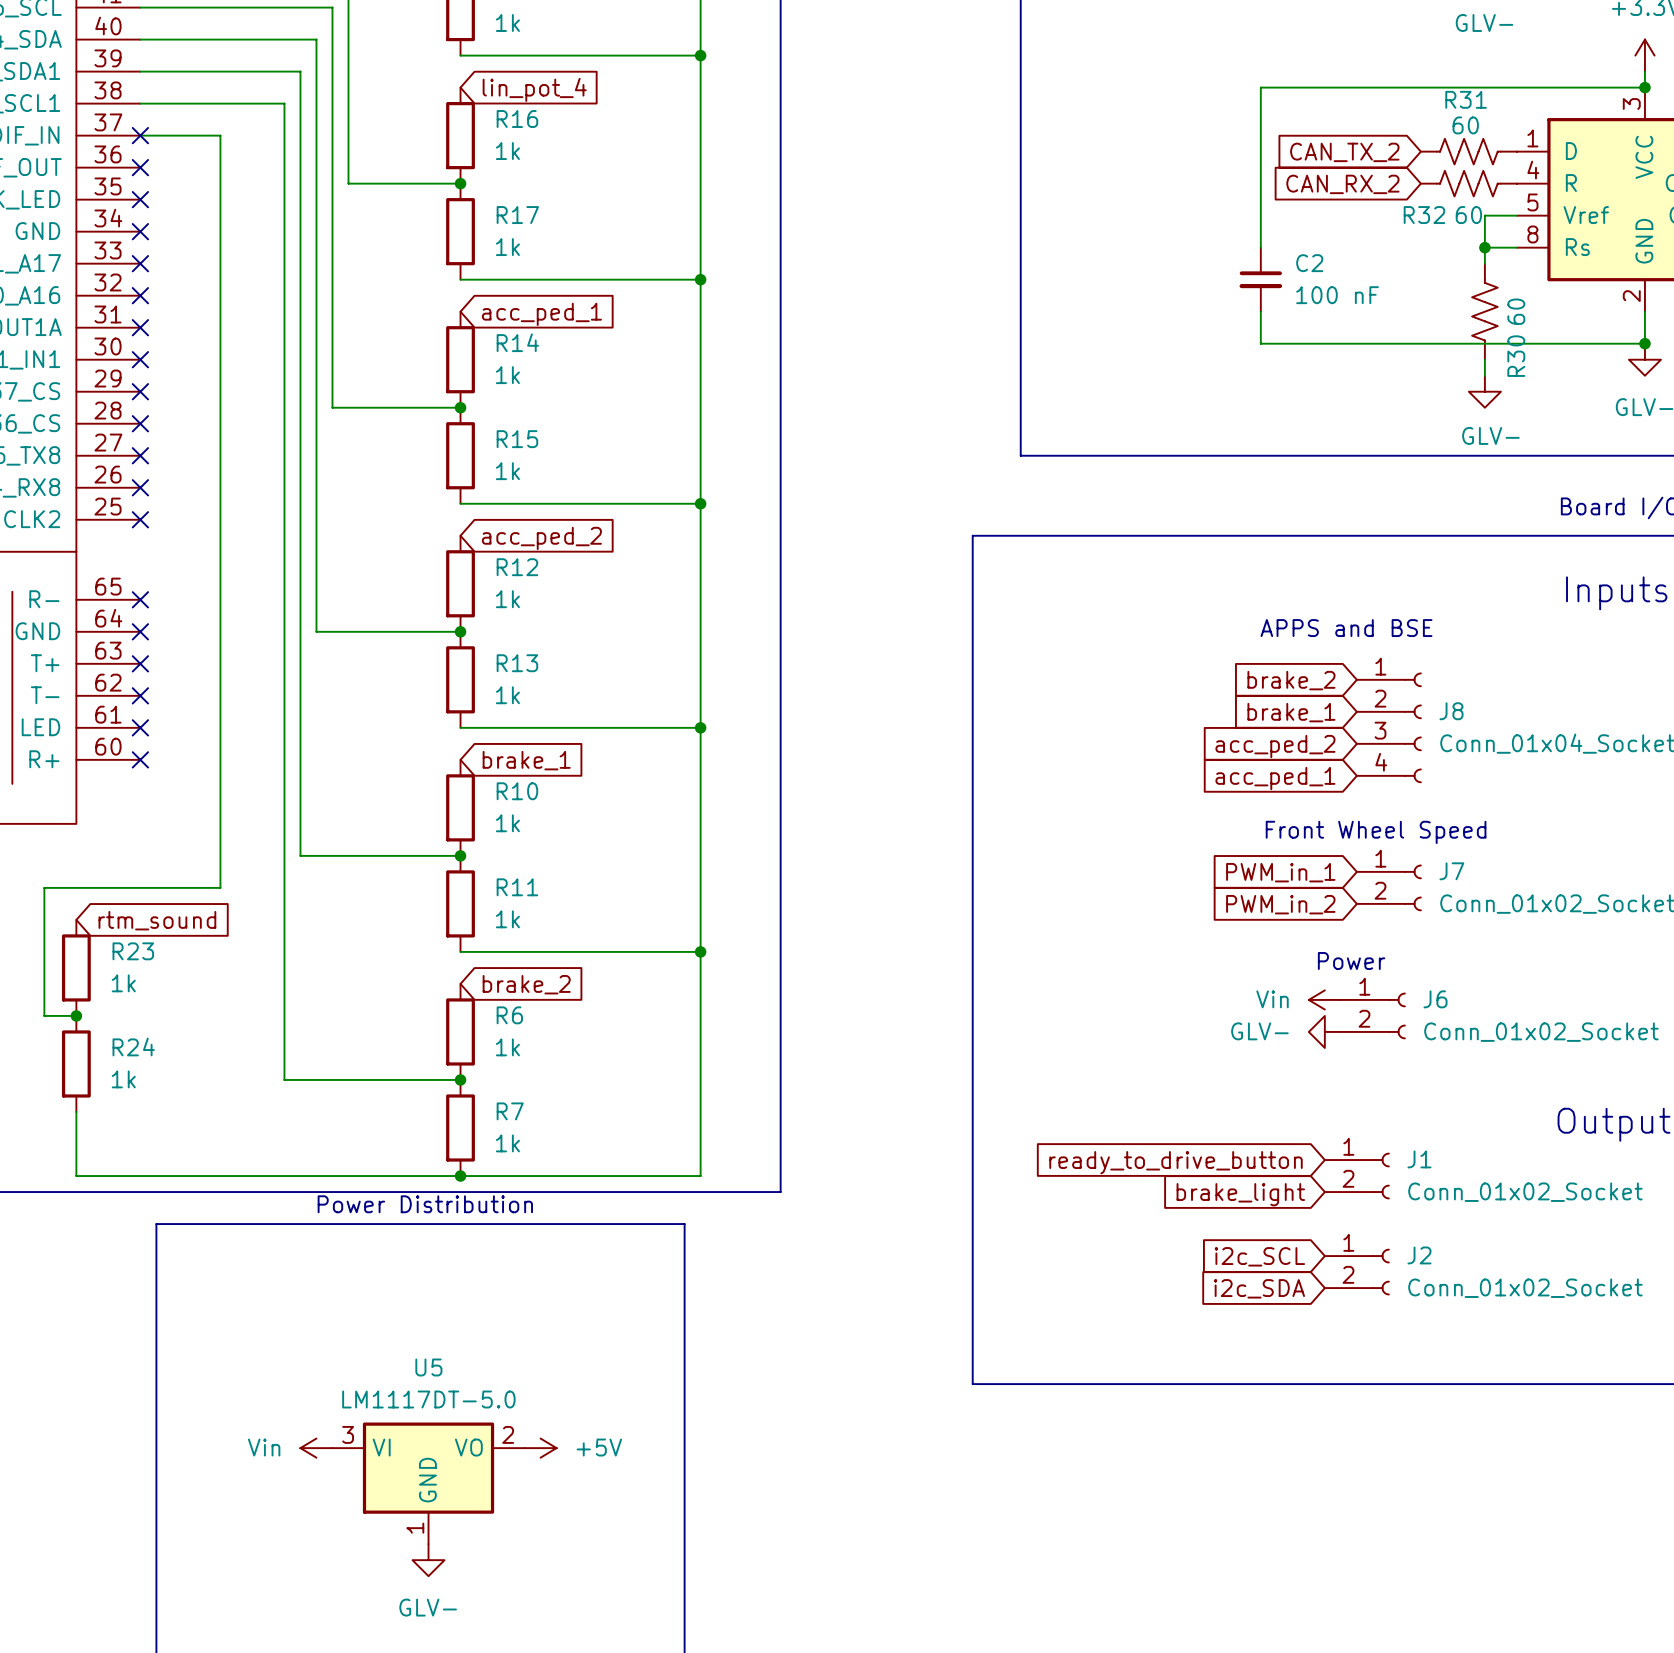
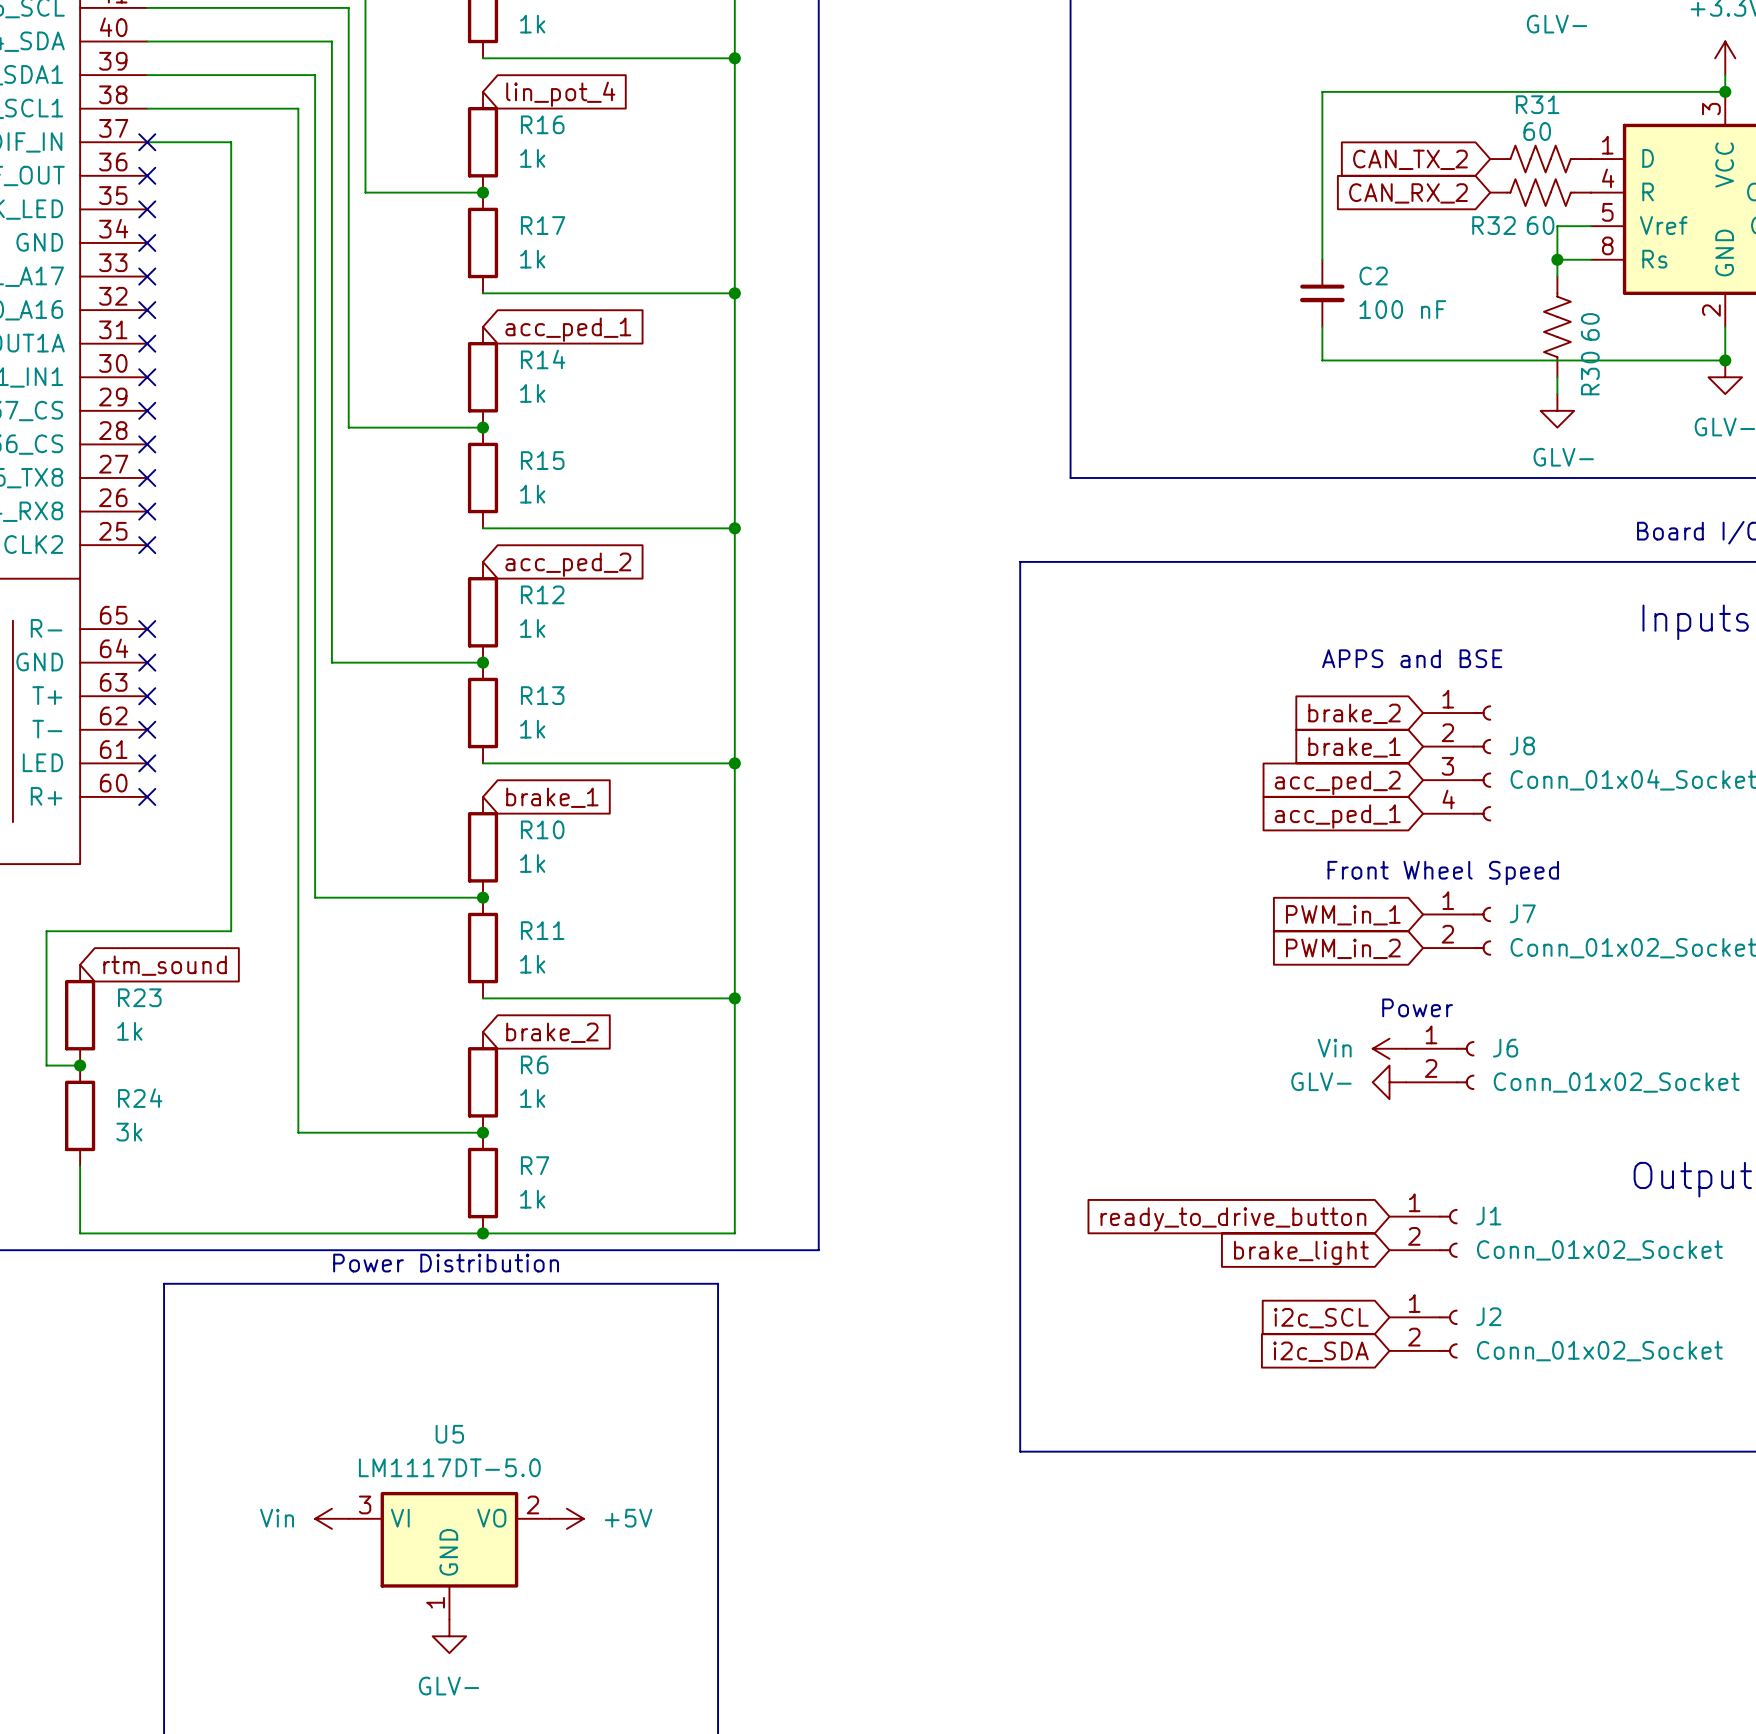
R24 value: 1k (123, 1079) -> 3k (129, 1132)

